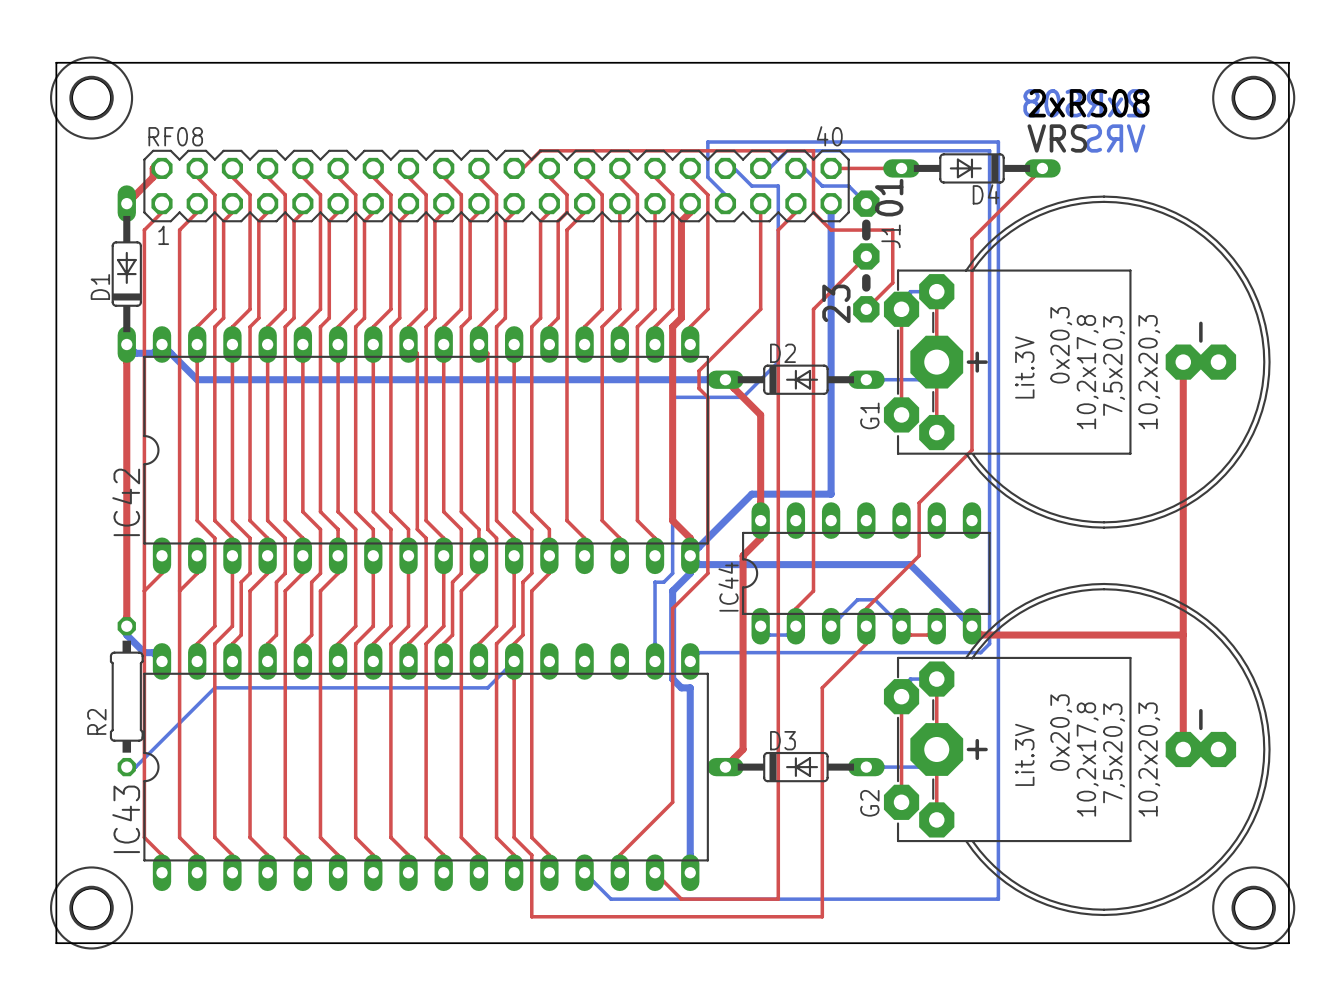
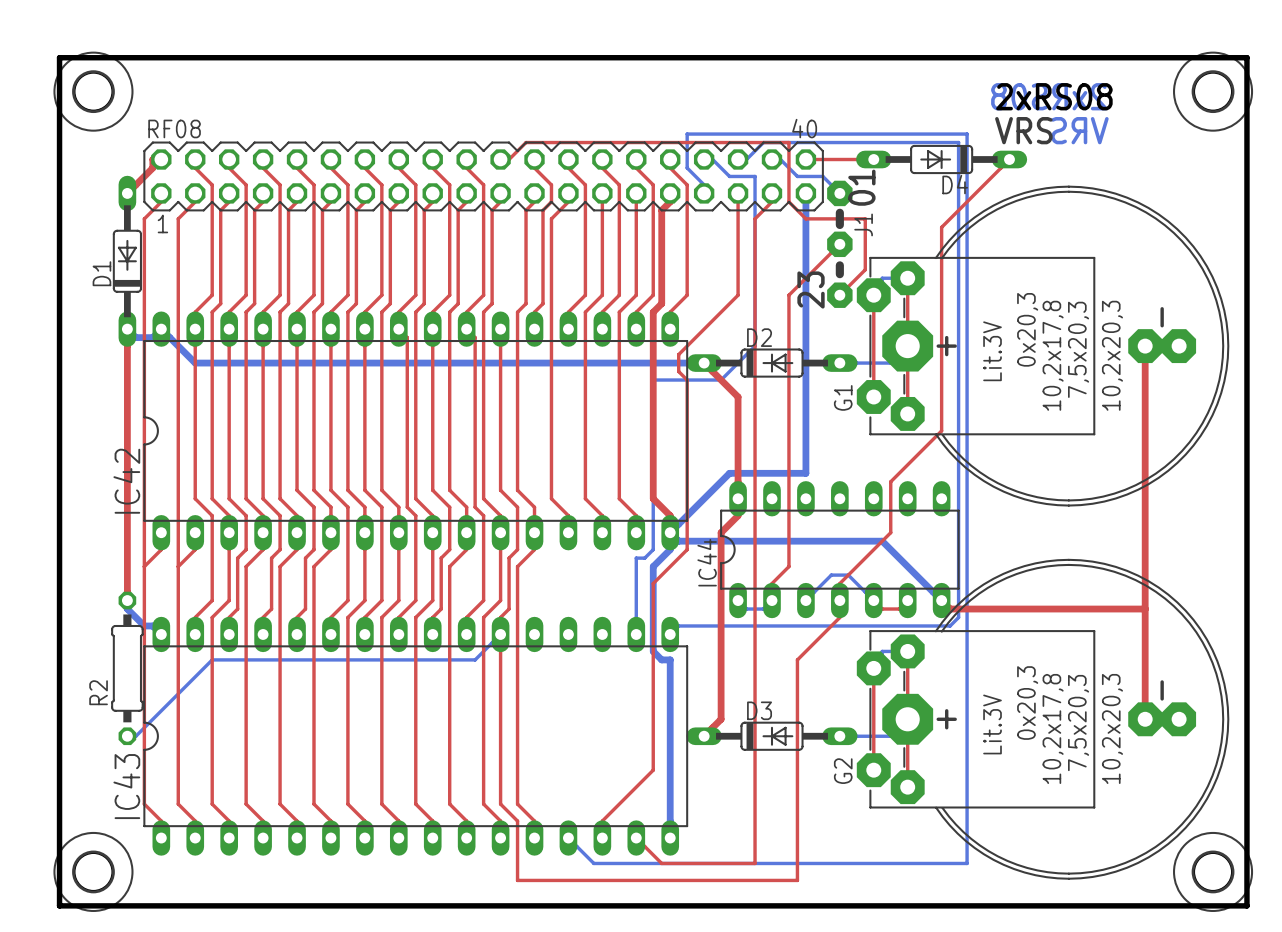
board edge width: thin (56, 62) (1288, 62) (1288, 943) (56, 943) (56, 62) -> thick (59, 57) (1246, 57) (1246, 905) (59, 905) (59, 57)

